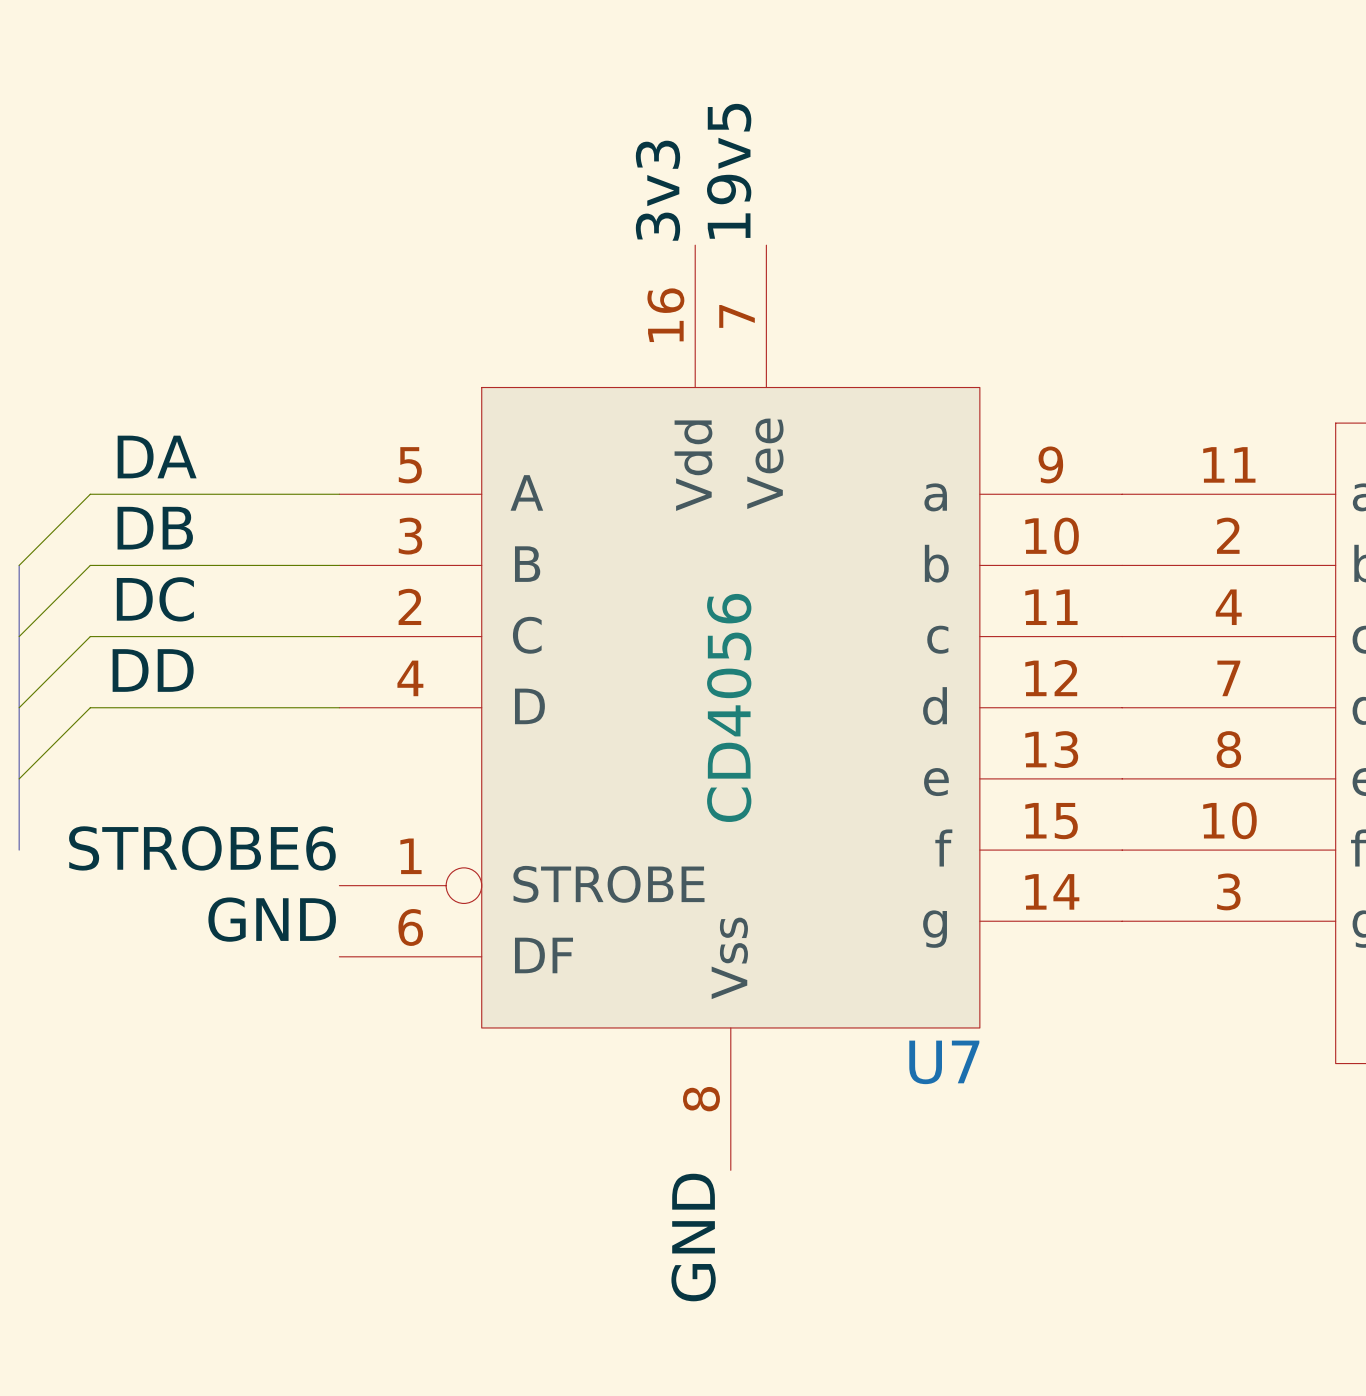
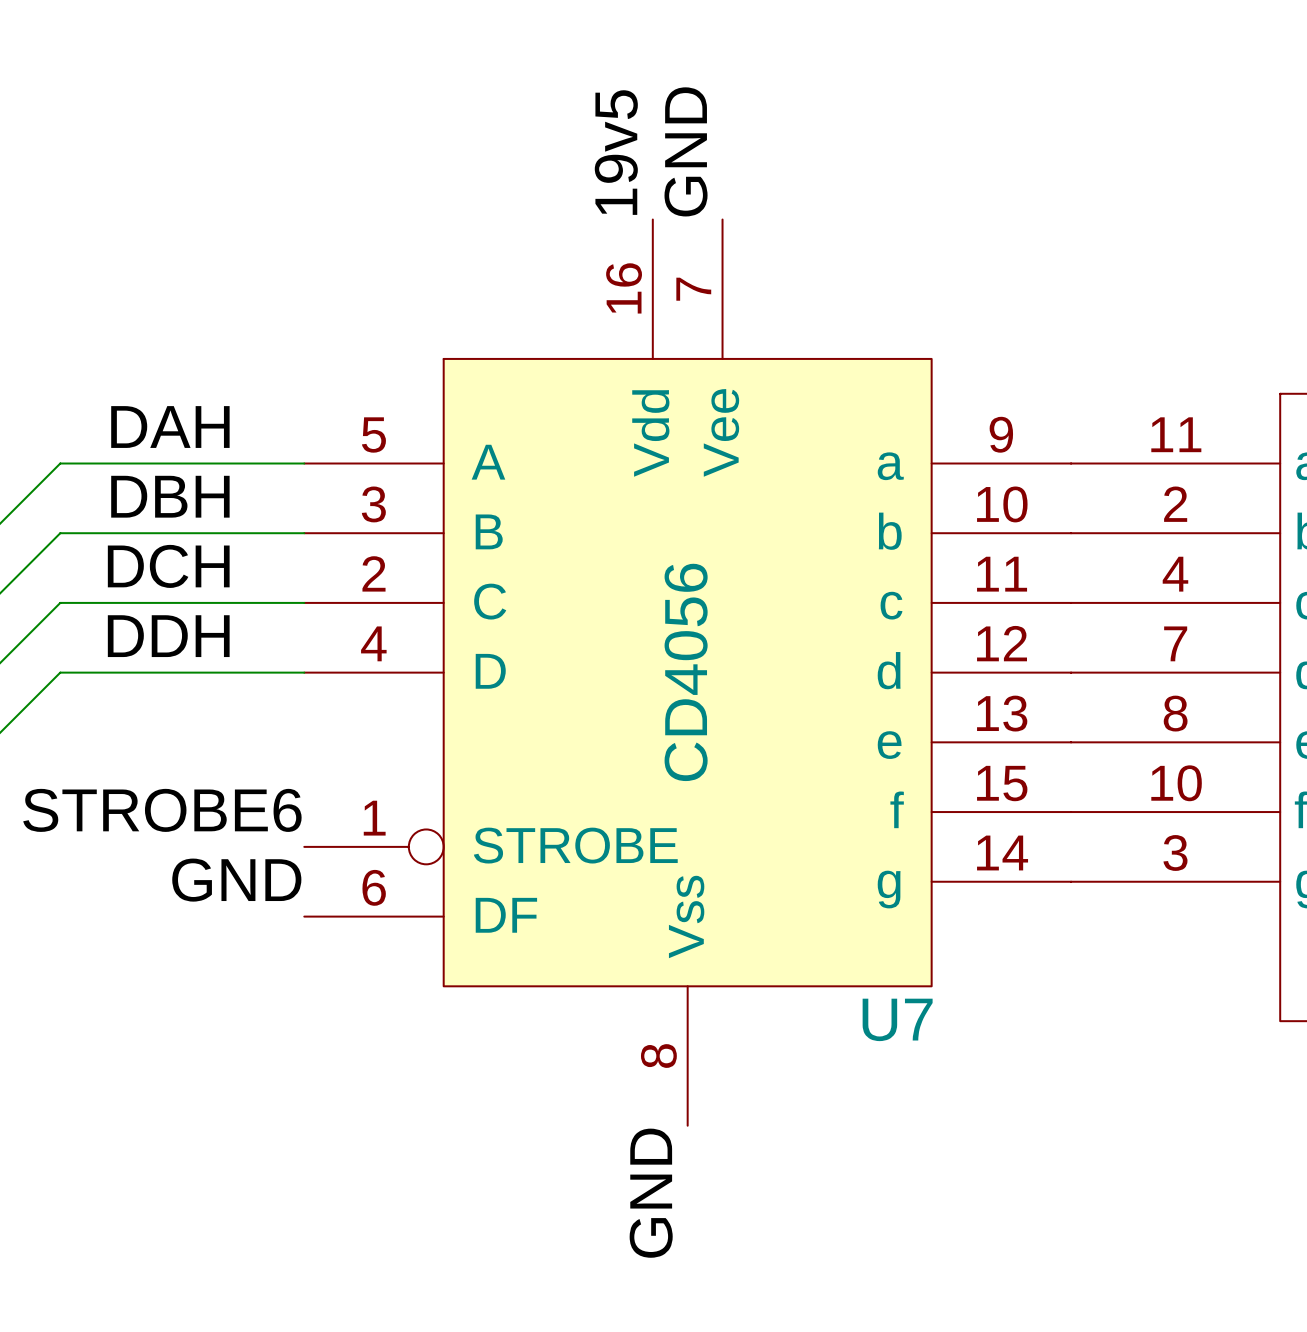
label: 19v5 (729, 171) -> GND (686, 151)
label: 3v3 (657, 190) -> 19v5 (616, 152)
label: DA (157, 457) -> DAH (170, 427)
label: DB (155, 528) -> DBH (170, 496)
label: DC (155, 599) -> DCH (168, 566)
label: DD (153, 670) -> DDH (168, 636)

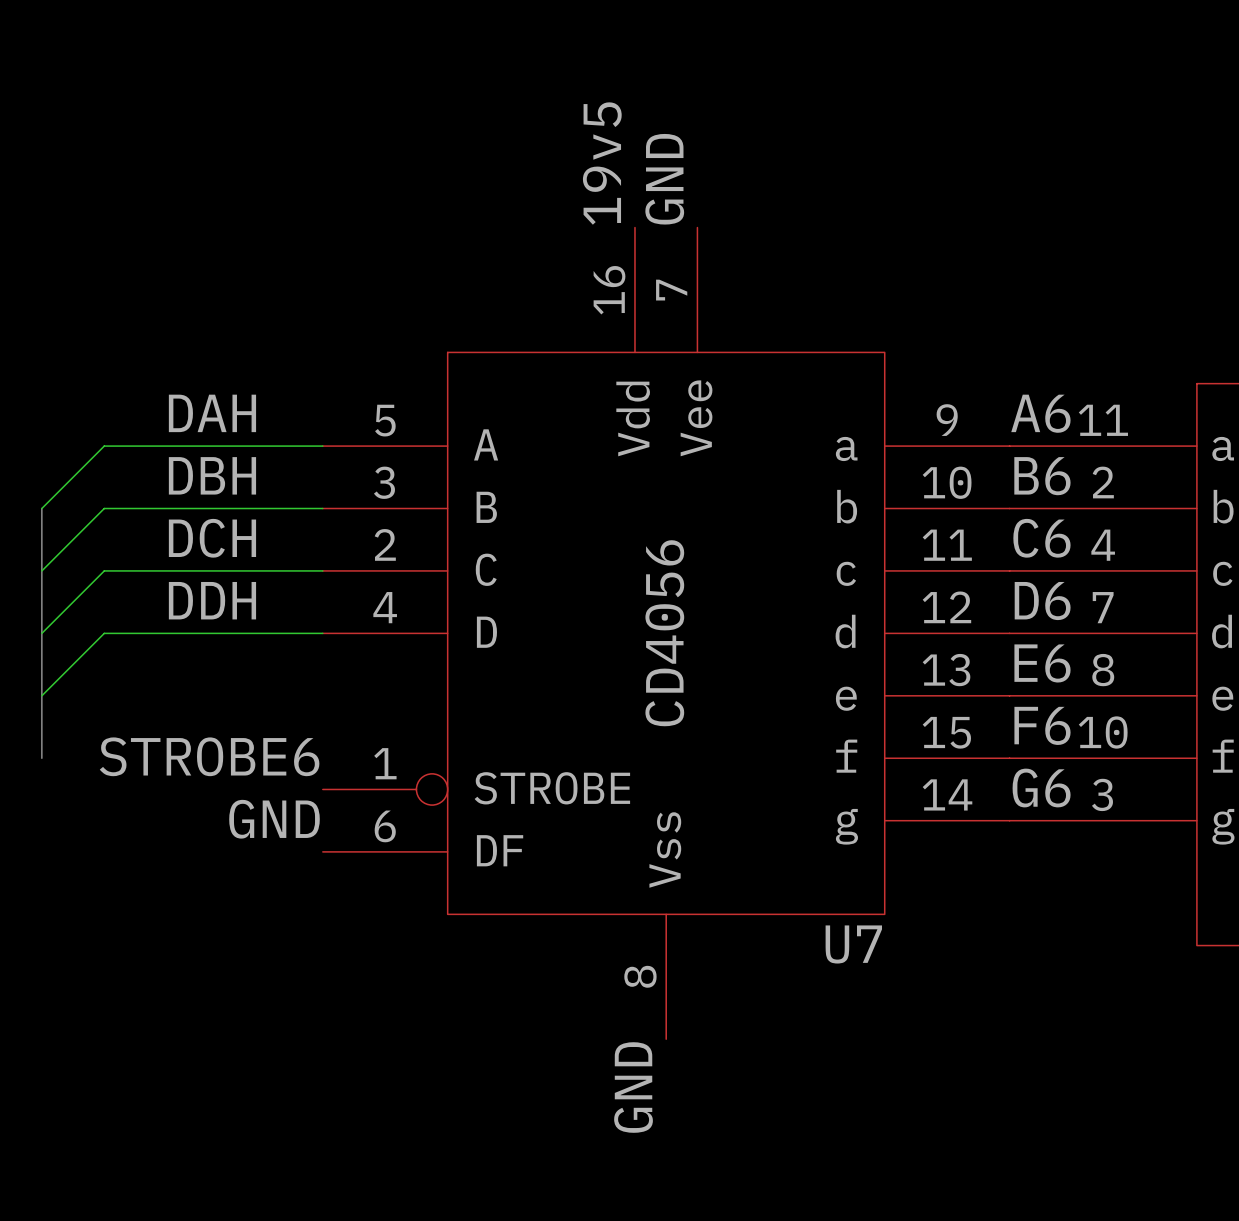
label: none -> A6 (1040, 413)
label: none -> B6 (1042, 476)
label: none -> C6 (1041, 538)
label: none -> D6 (1042, 601)
label: none -> E6 (1042, 663)
label: none -> F6 (1042, 725)
label: none -> G6 (1041, 788)

